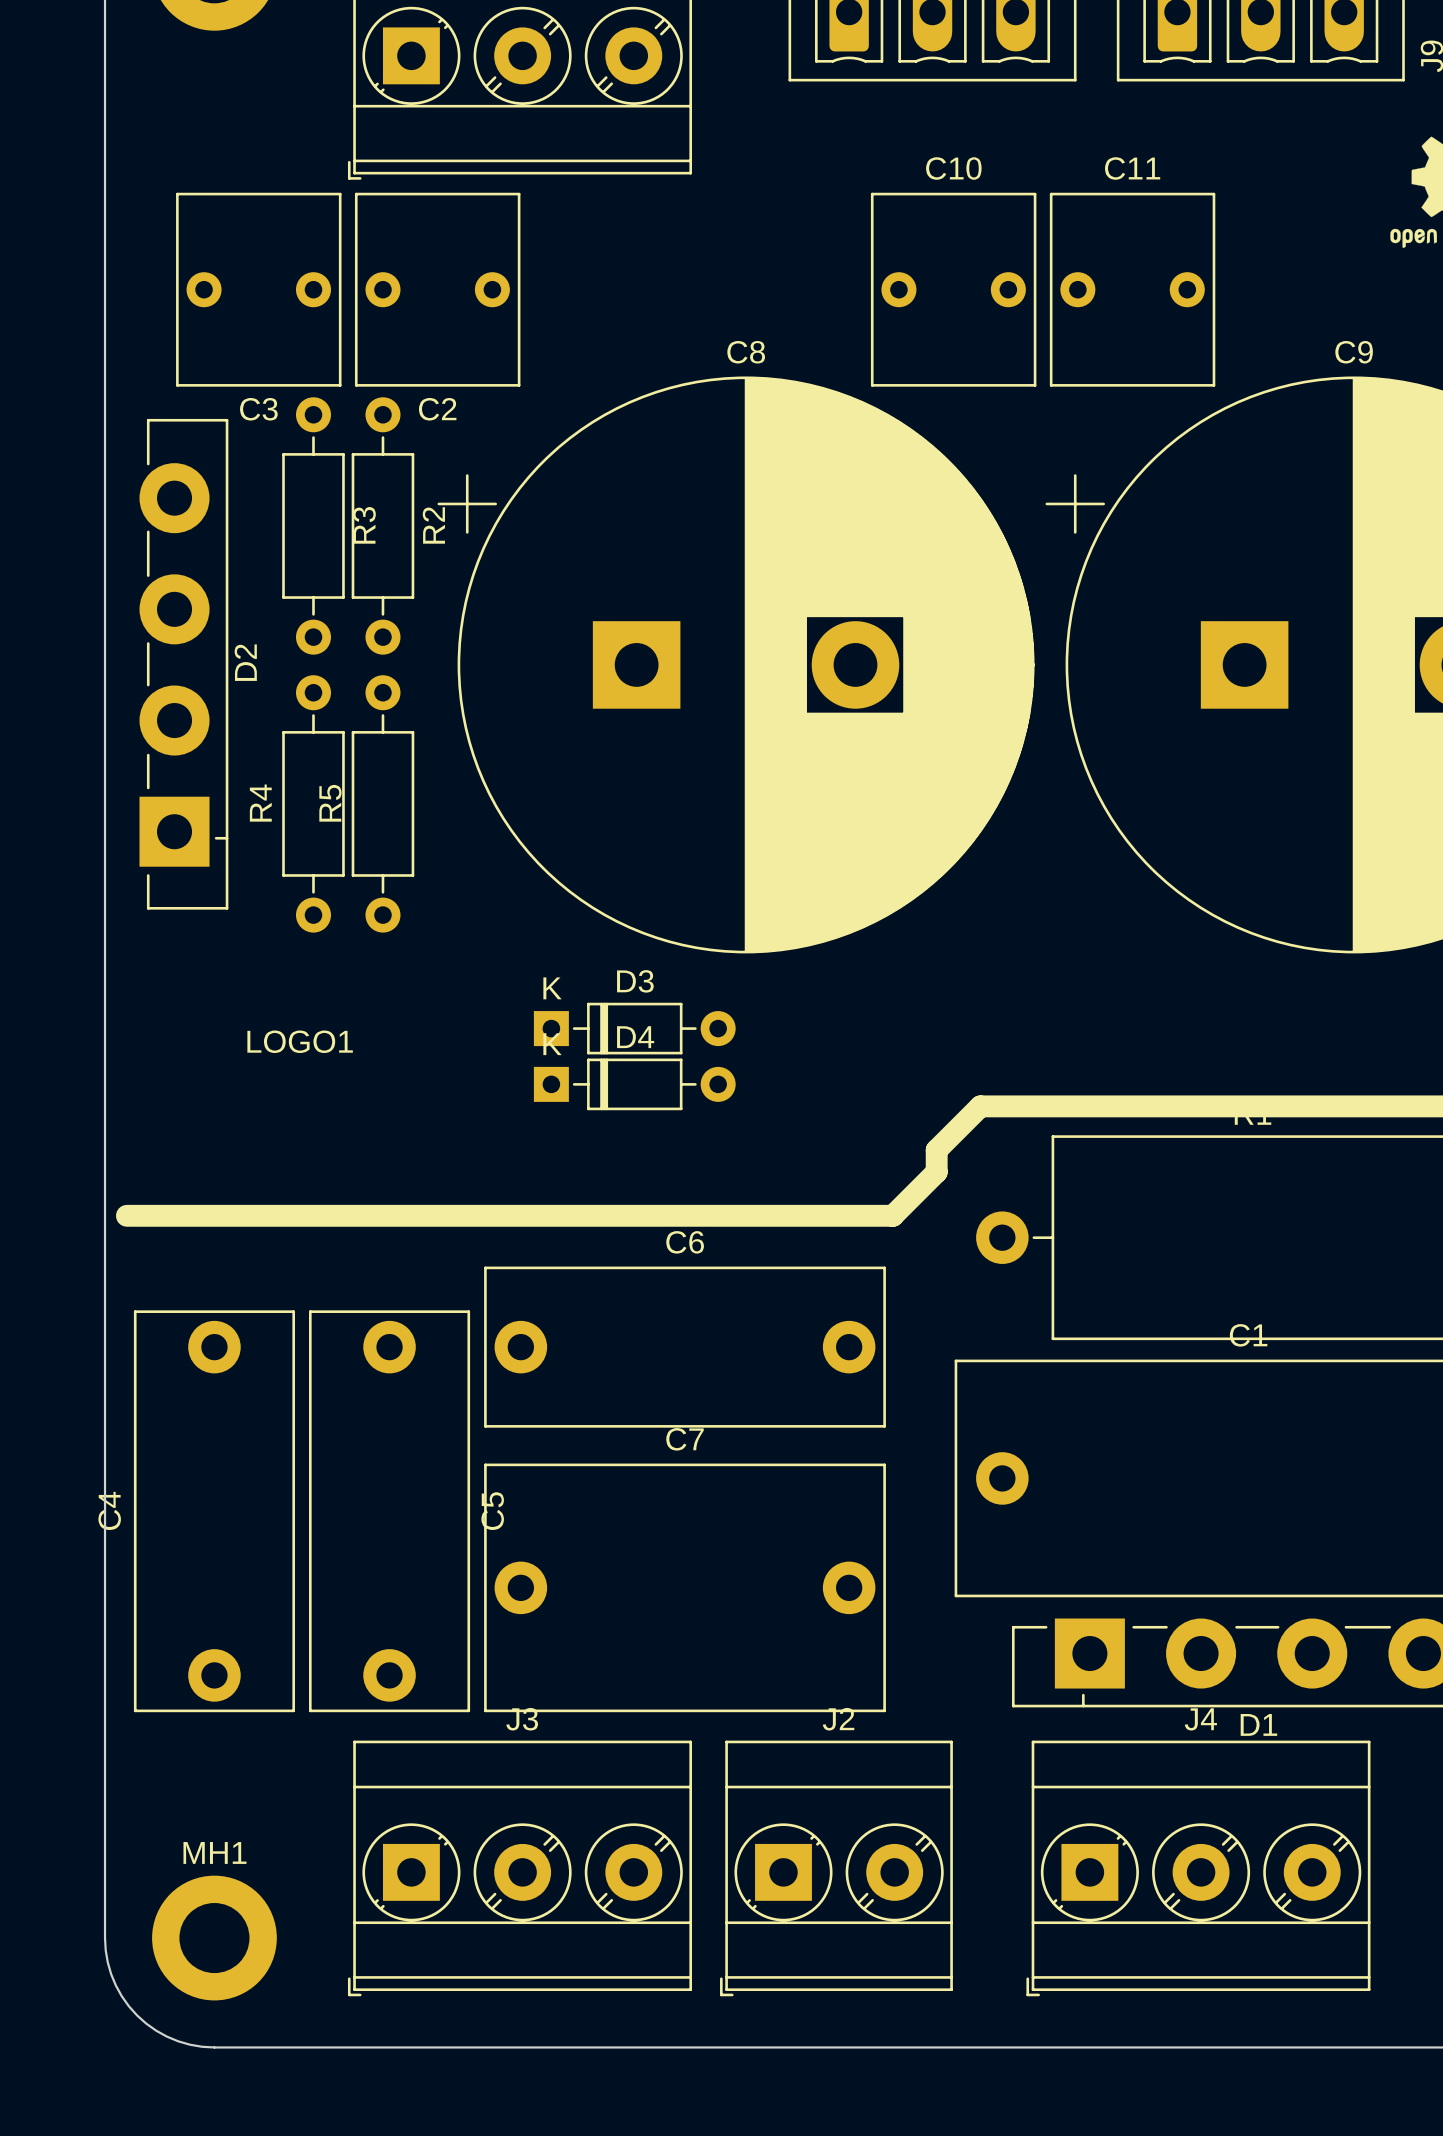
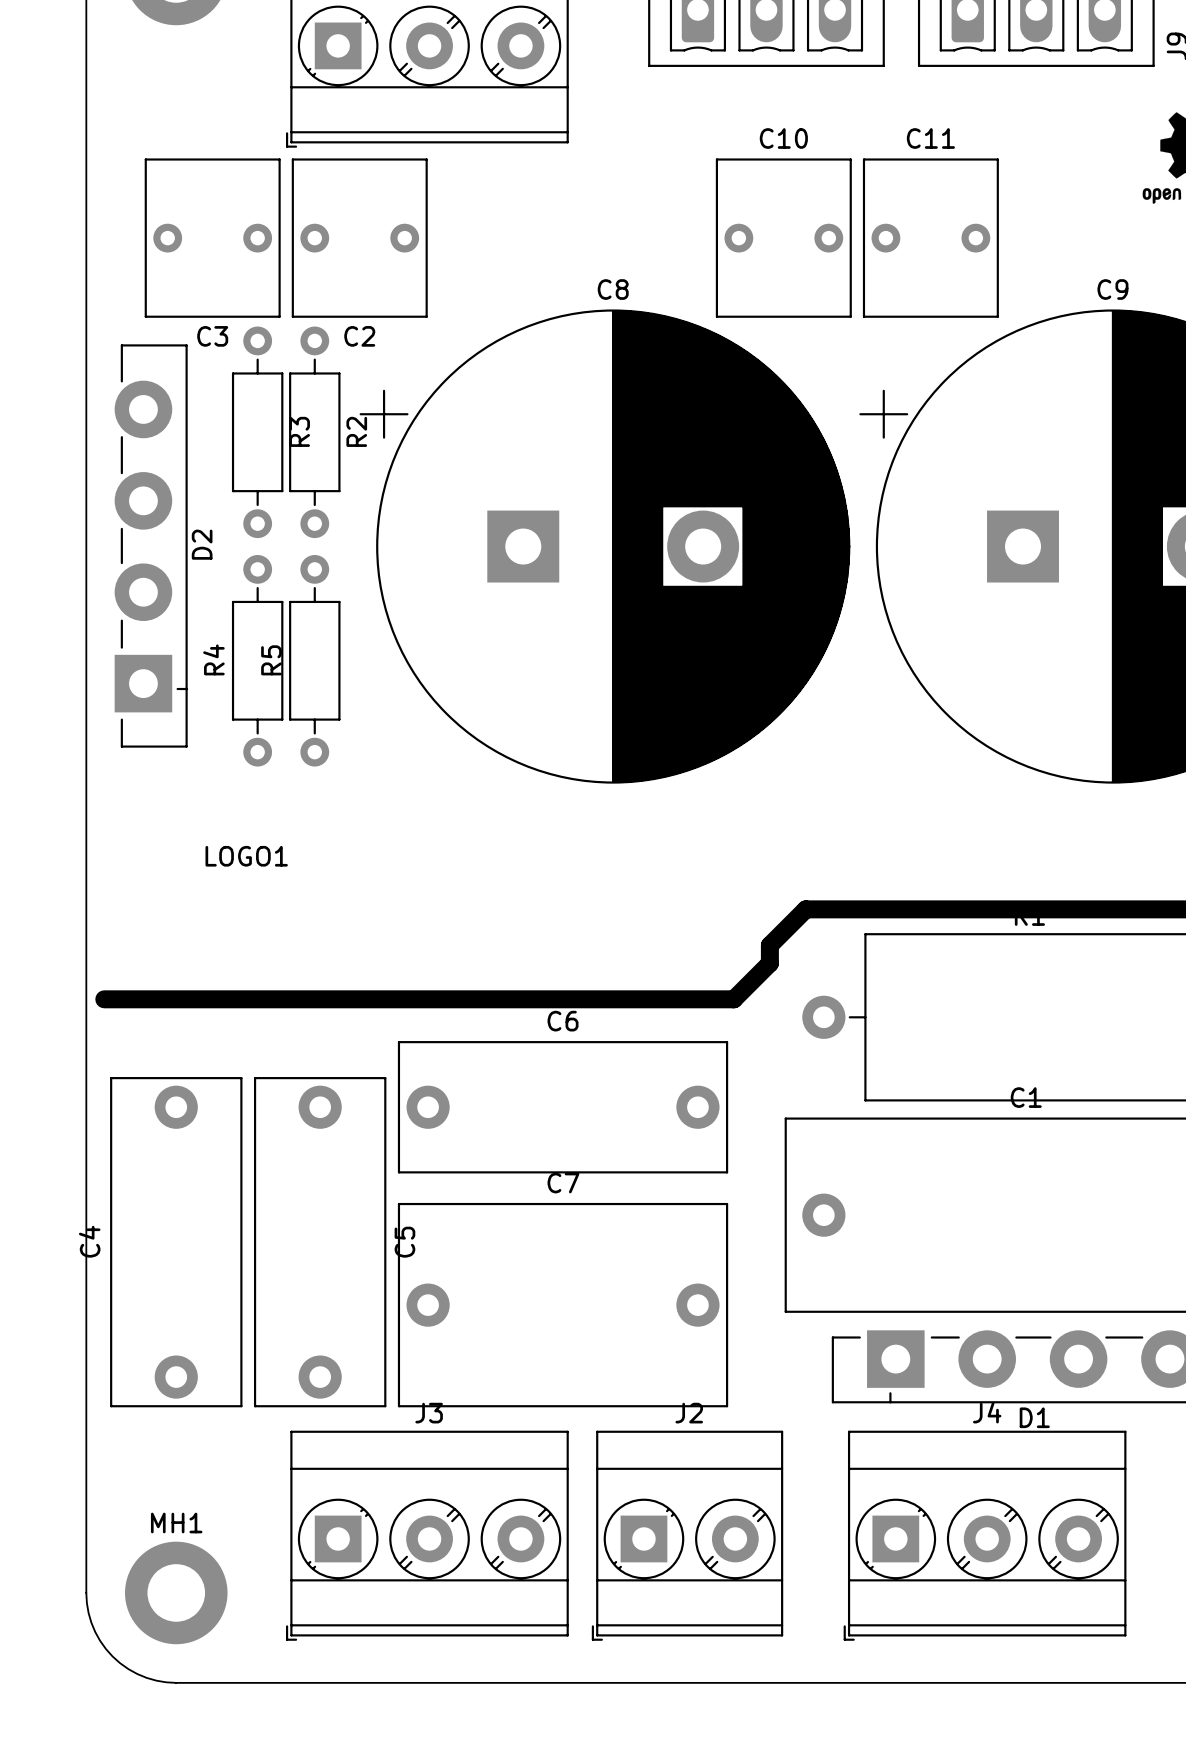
D3: (634, 1028) -> none
D4: (634, 1084) -> none

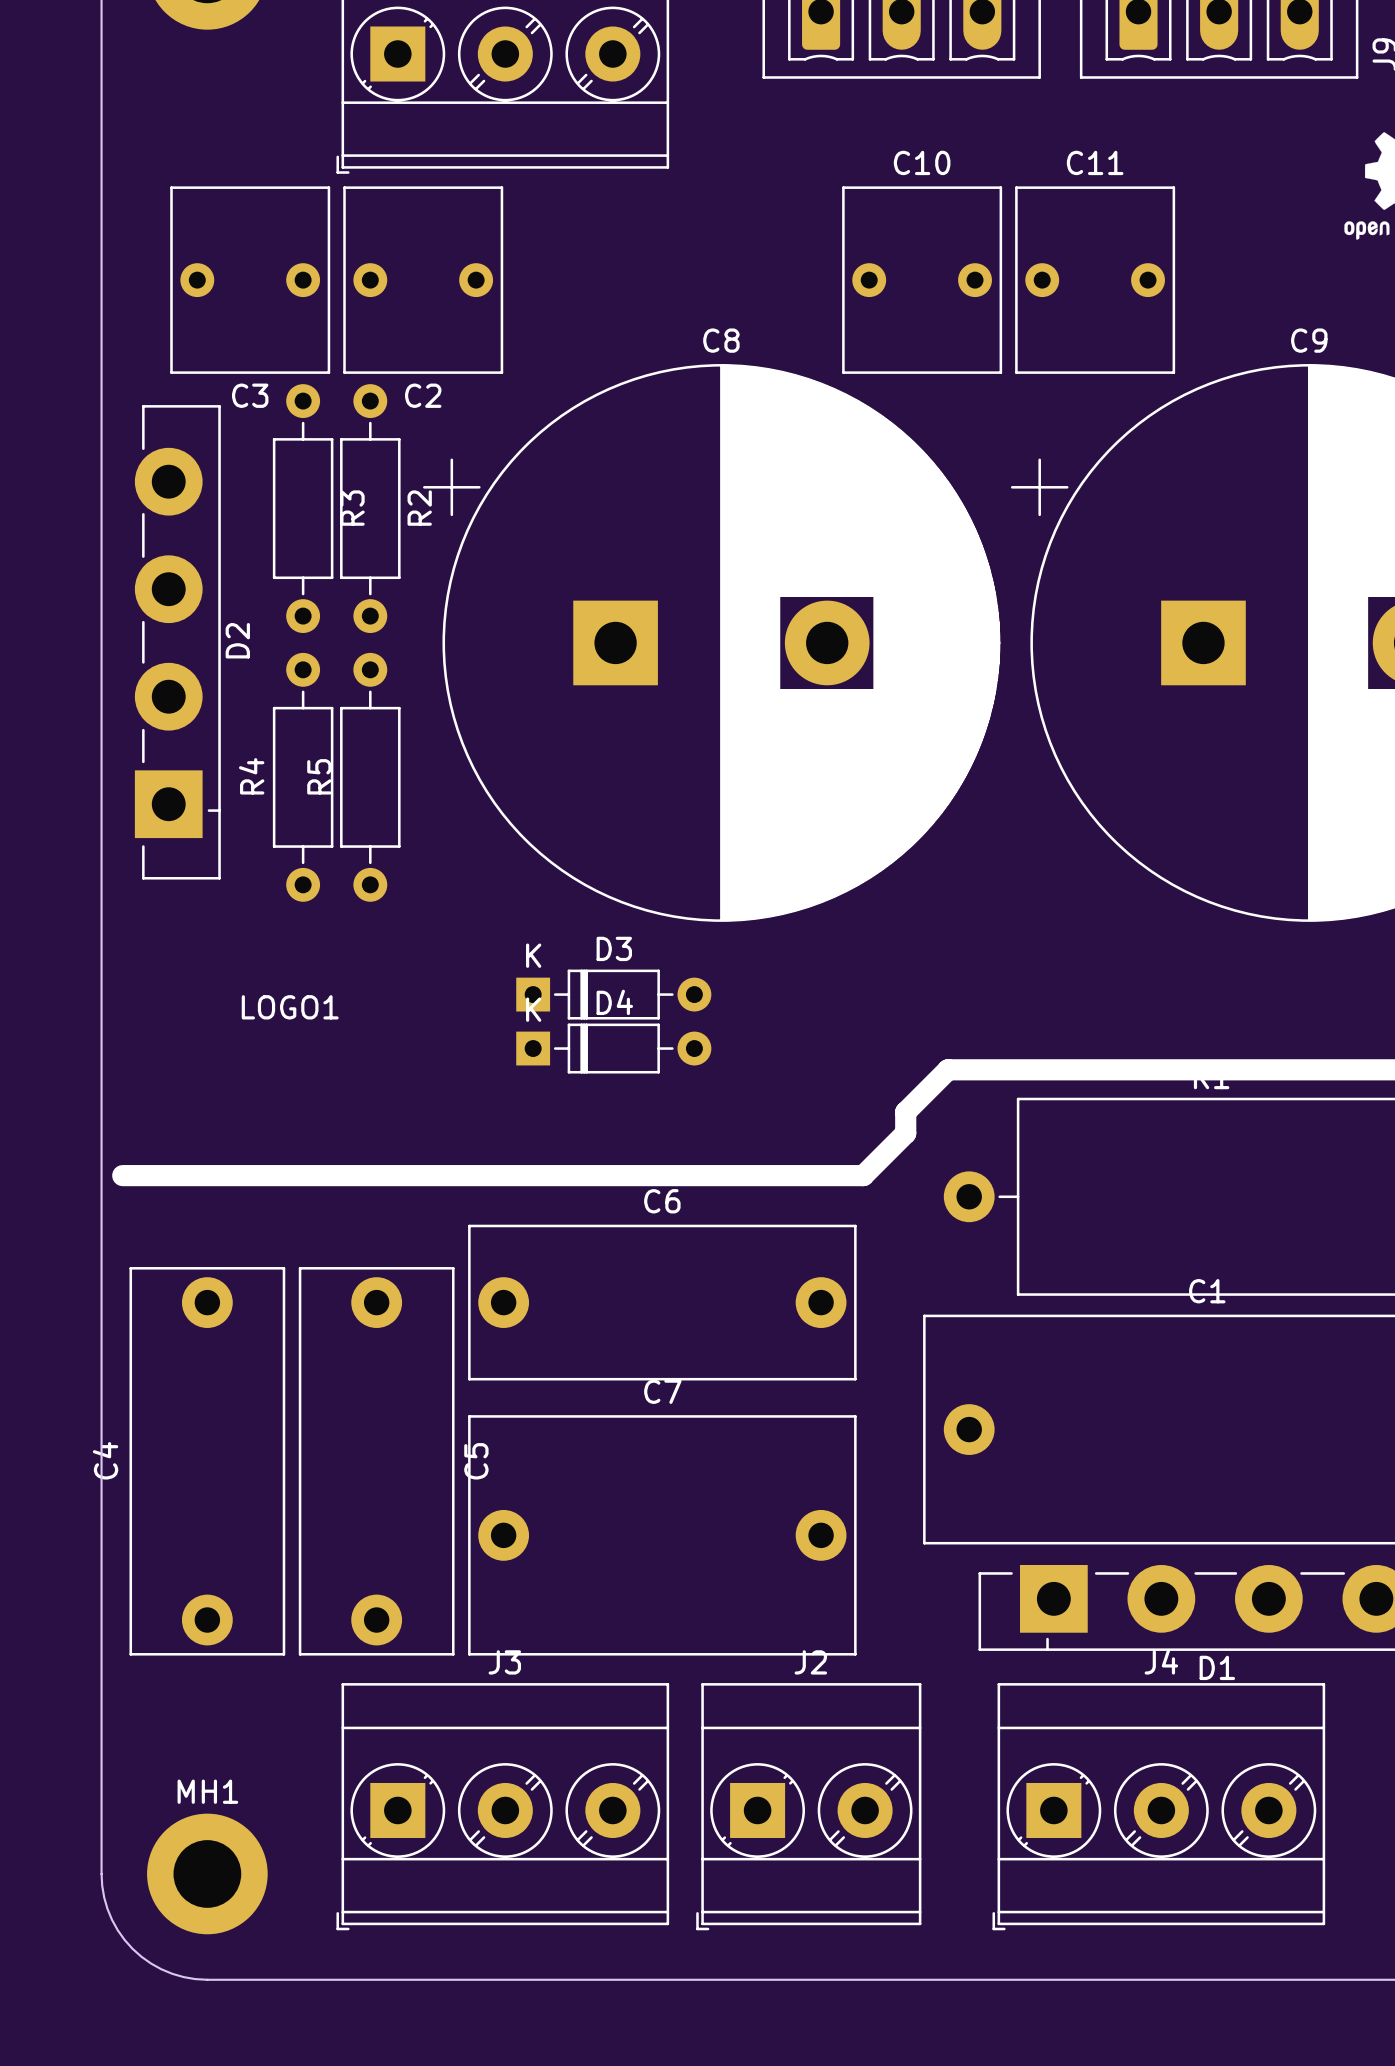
D3: none -> (613, 994)
D4: none -> (613, 1048)

